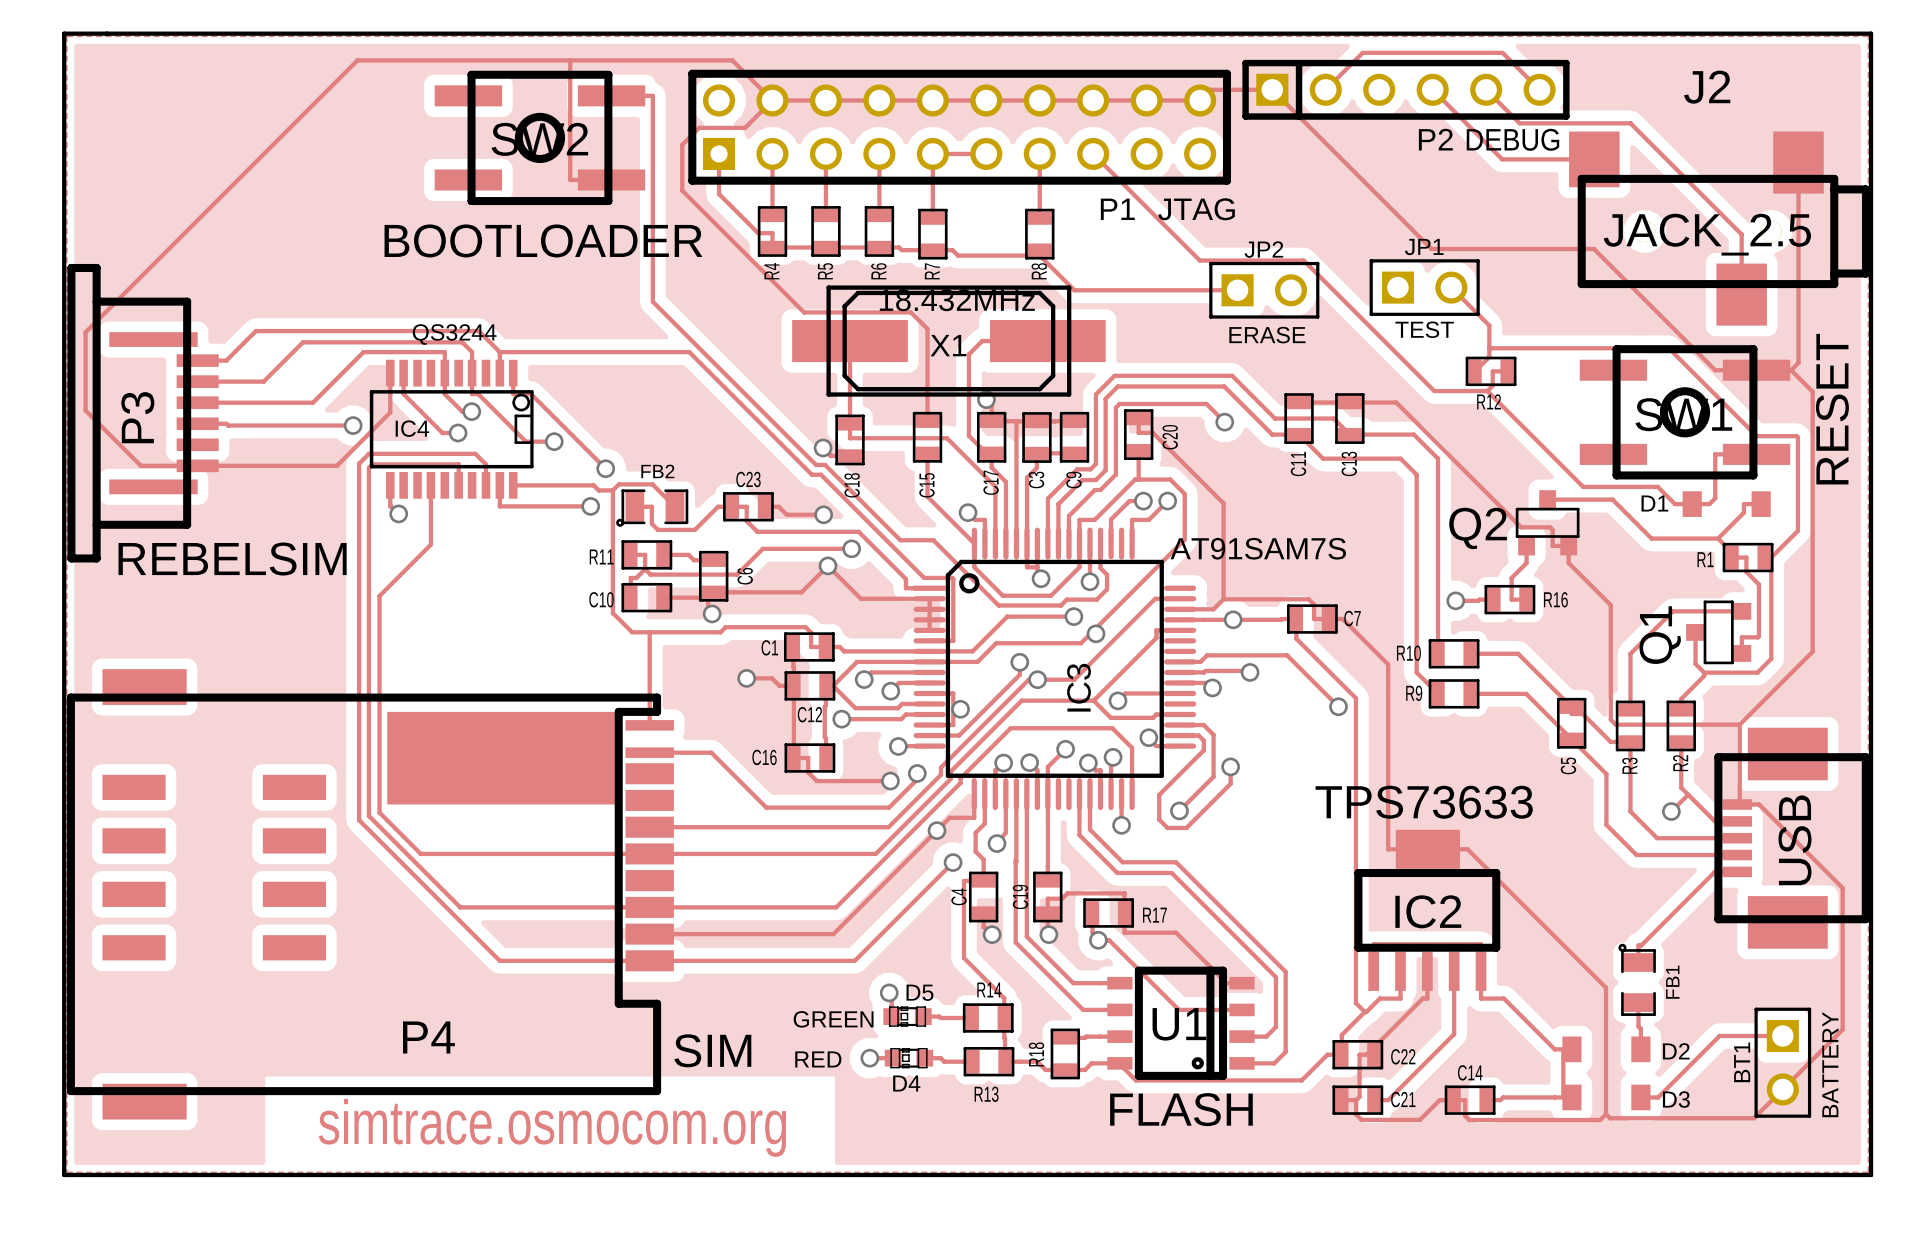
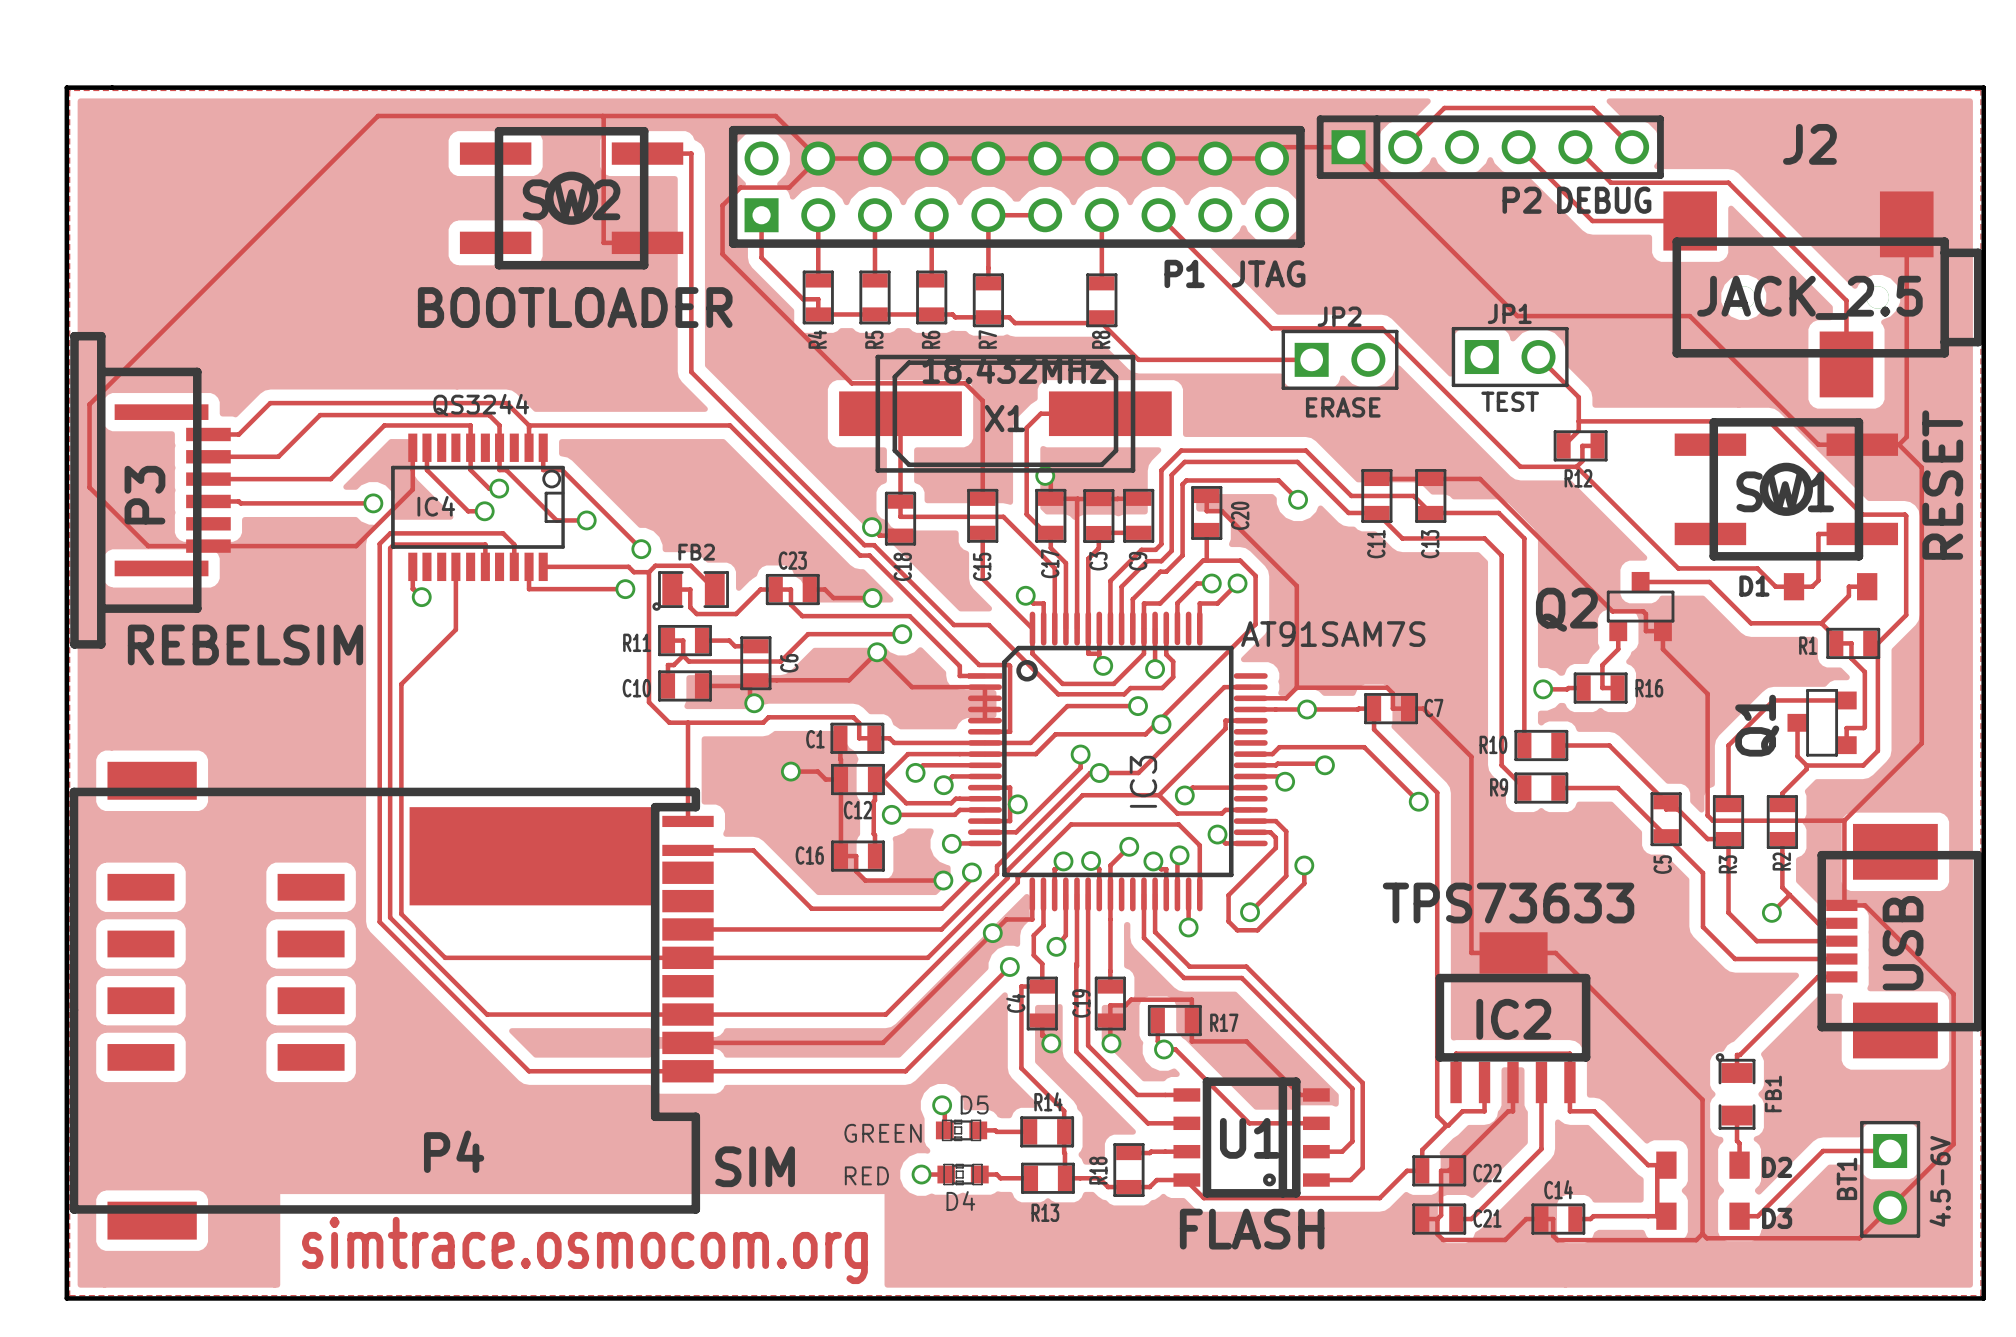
BT1 value: BATTERY (1830, 1064) -> 4.5-6V (1940, 1181)

